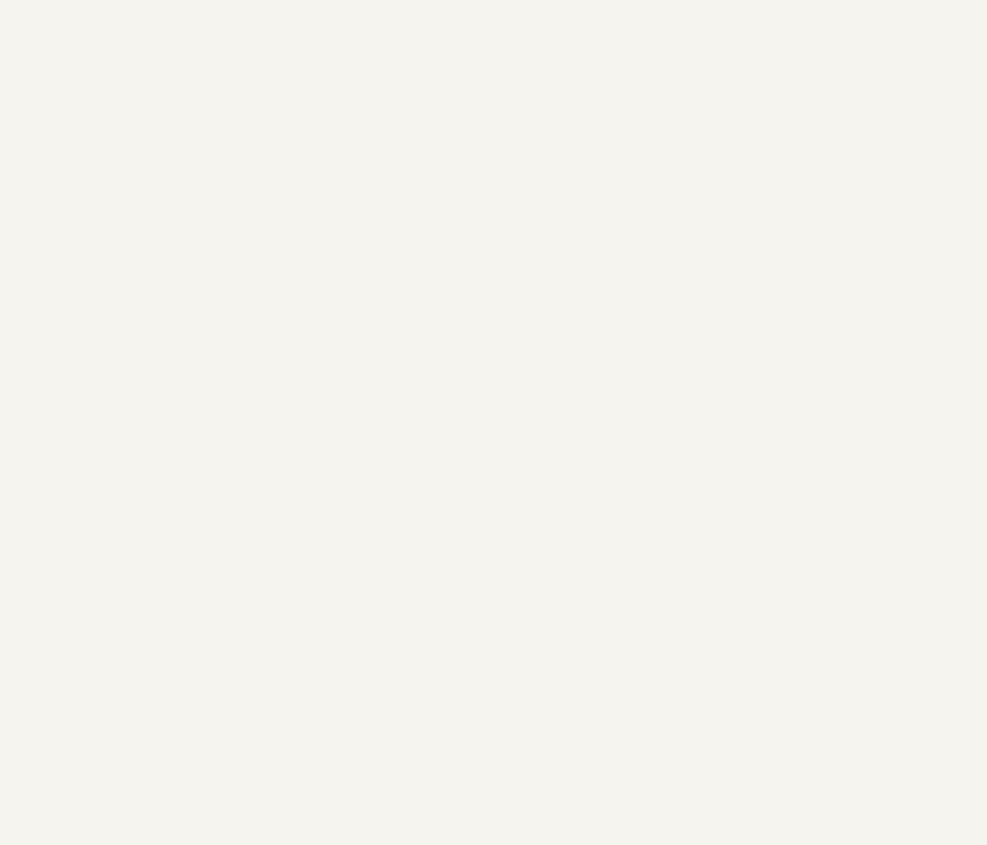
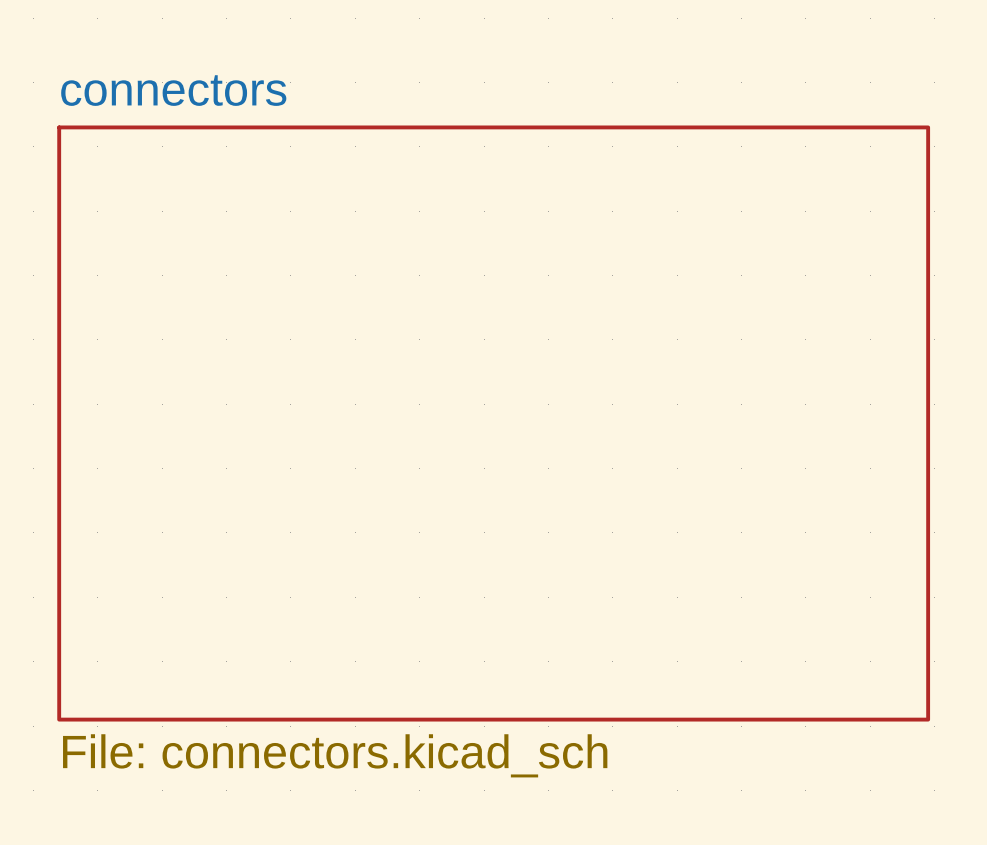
sheet connectors: none -> File: connectors.kicad_sch (493, 423)

